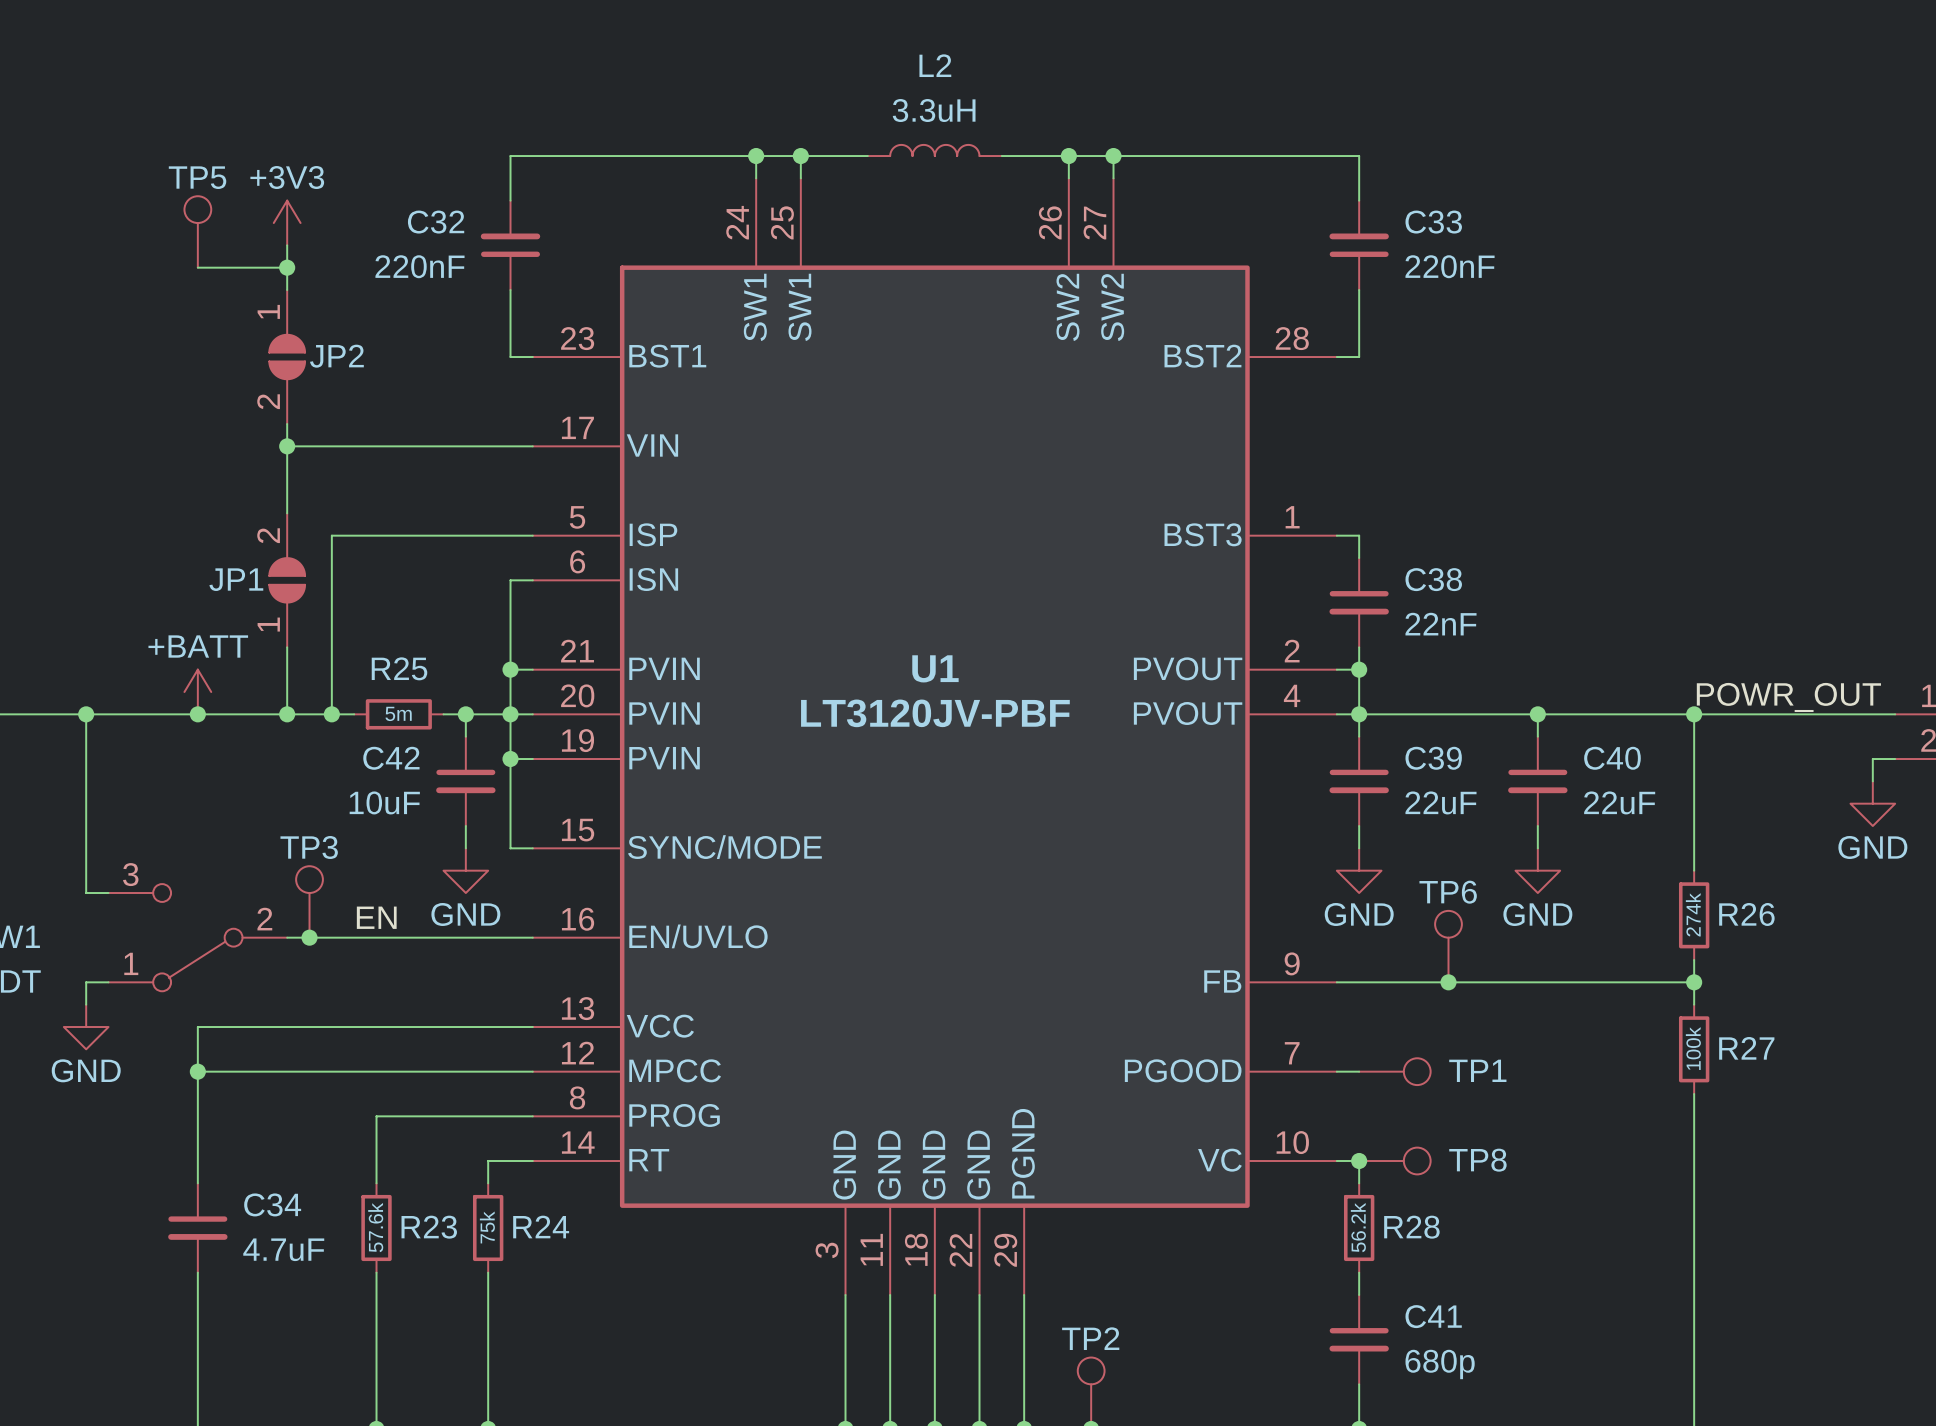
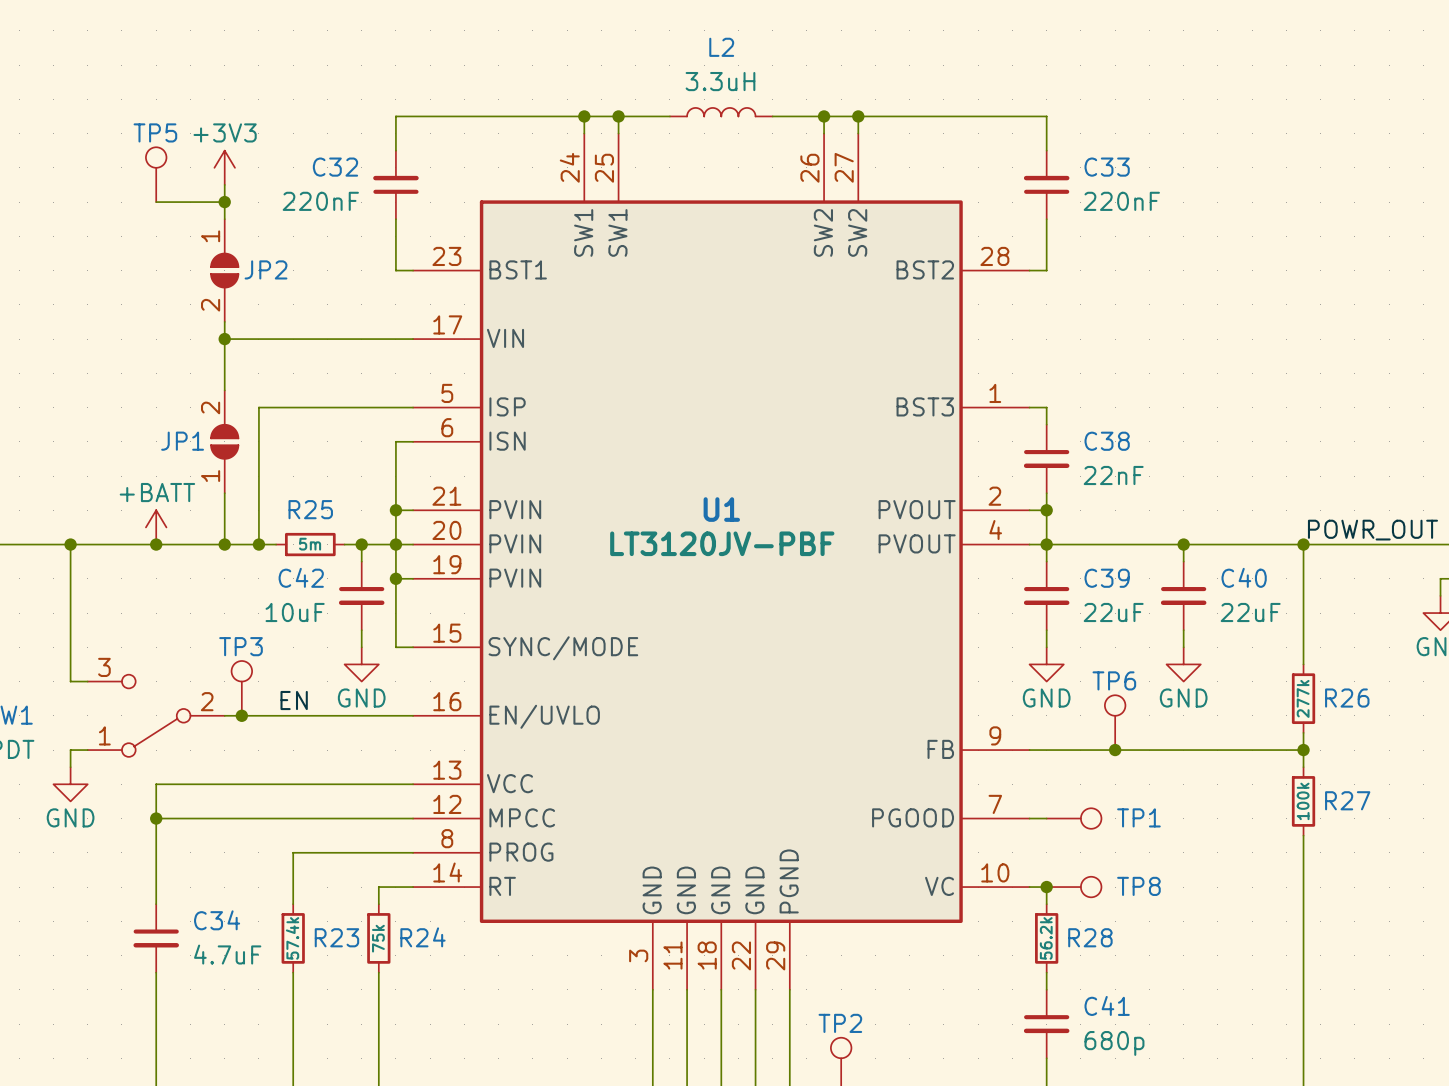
R26 value: 274k (1693, 914) -> 277k (1303, 698)
R23 value: 57.6k (375, 1227) -> 57.4k (292, 938)

